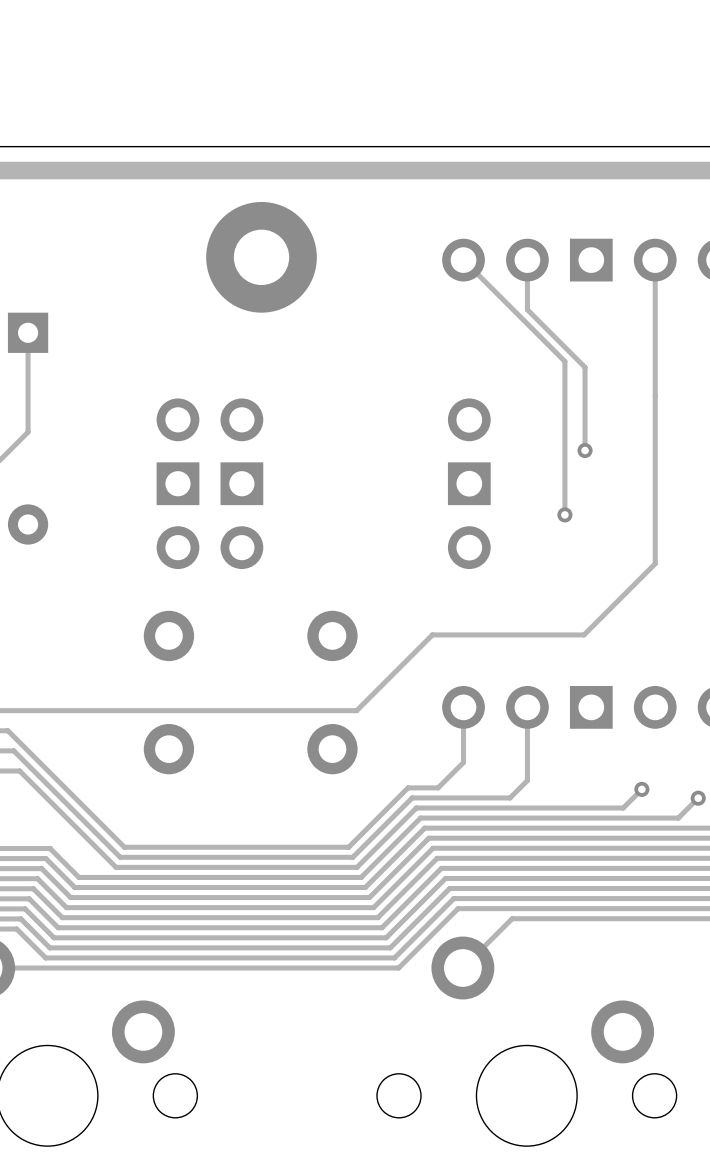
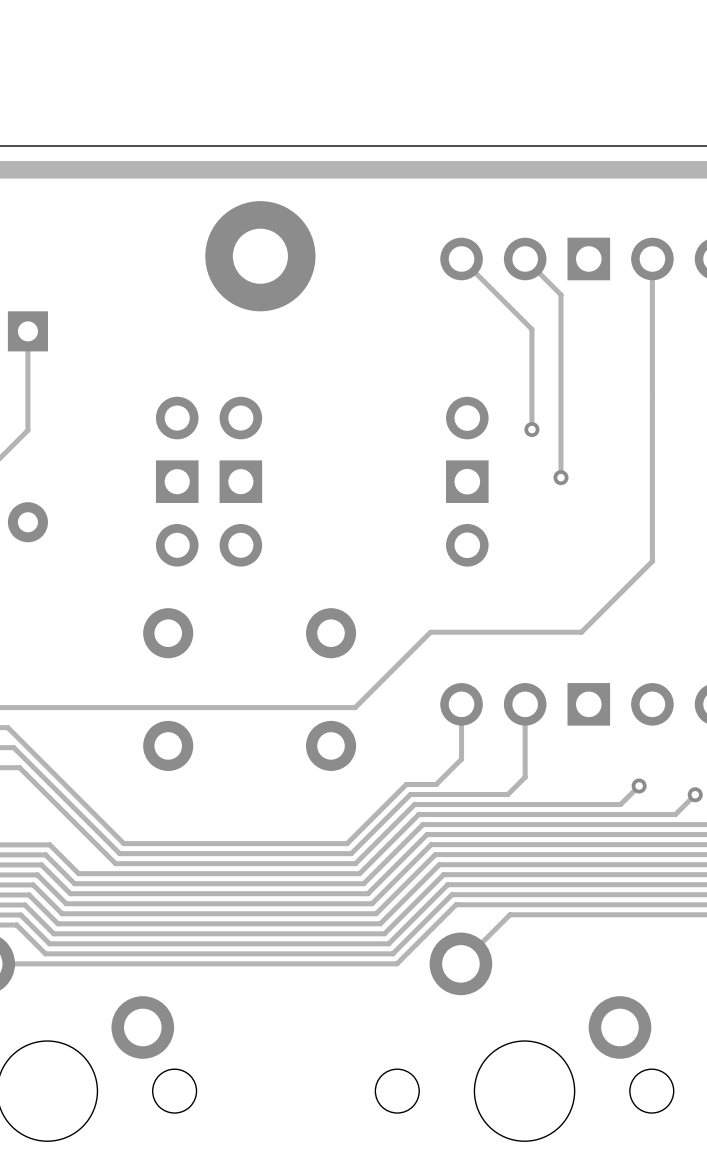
track: (527, 260) (527, 309) (585, 367) (585, 450) -> (525, 258) (560, 294) (560, 477)
track: (534, 330) (564, 361) (564, 514) -> (531, 329) (531, 429)
via: none -> (531, 429)
via: (585, 450) -> none
via: none -> (560, 477)
via: (564, 514) -> none

